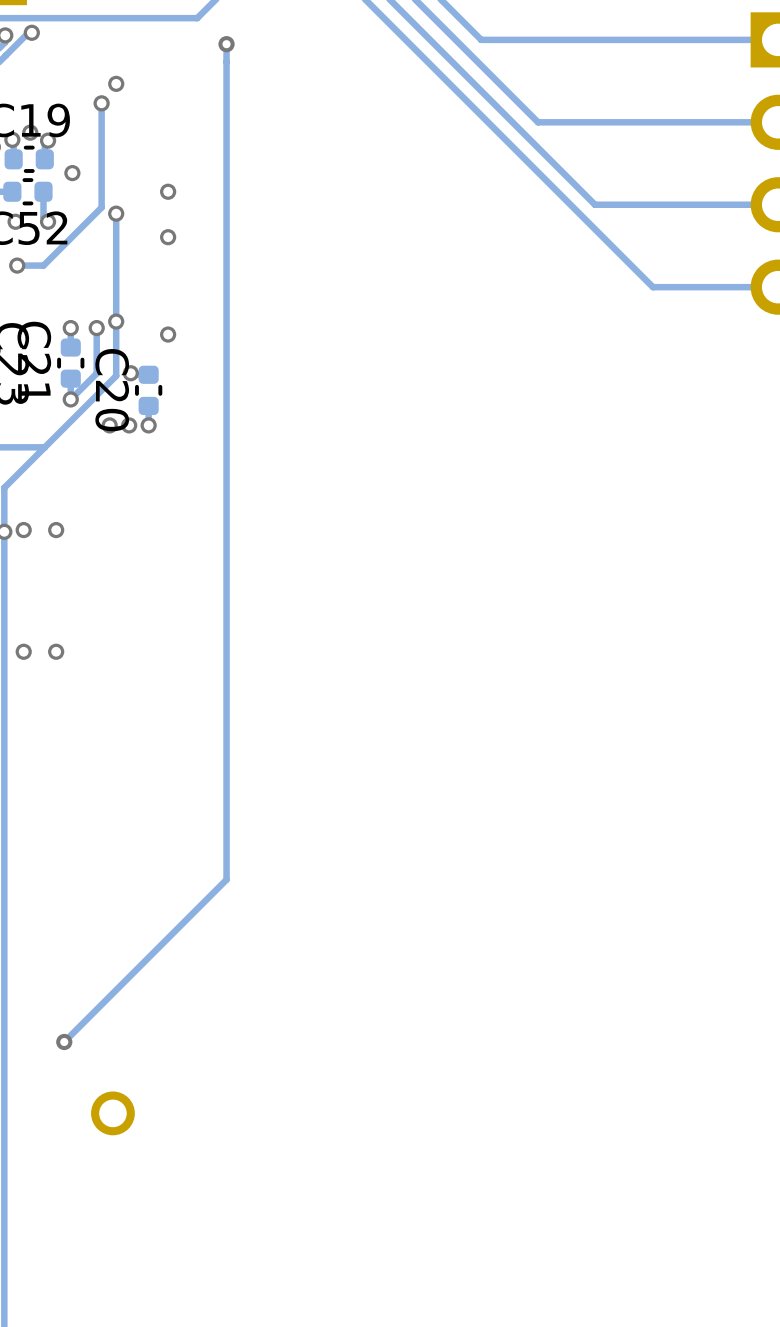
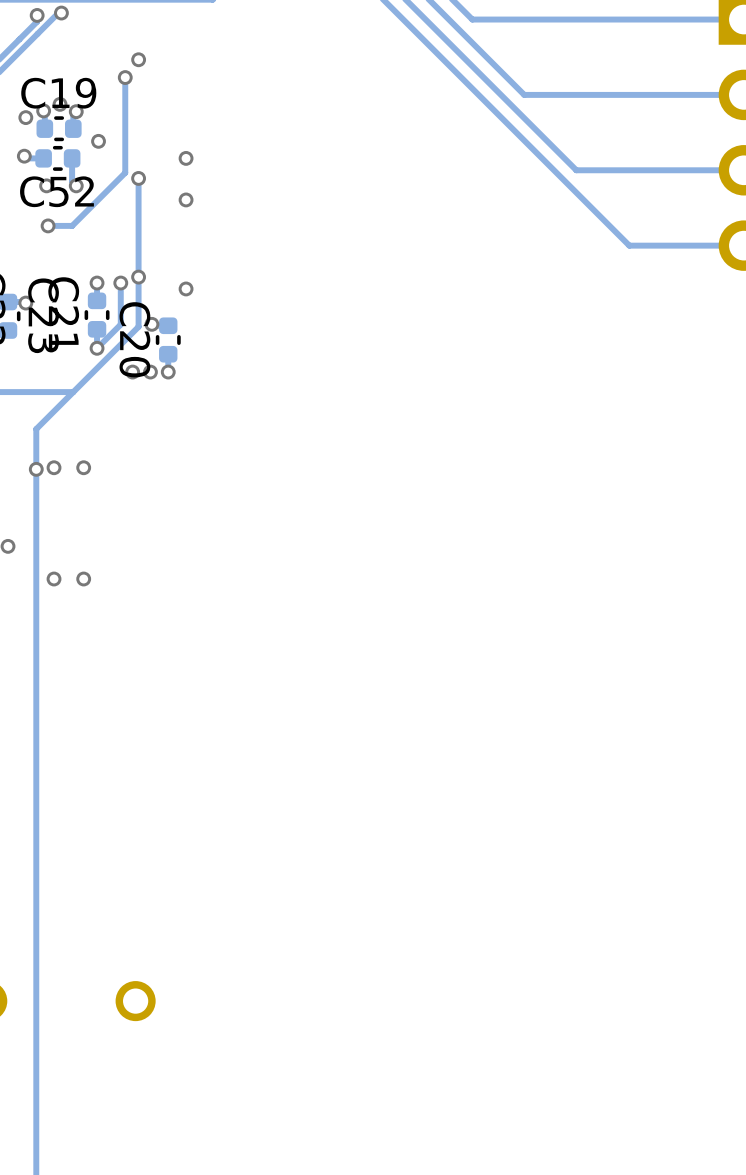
track: (226, 44) (226, 879) (64, 1042) -> none
via: (226, 44) -> none
via: (64, 1042) -> none

